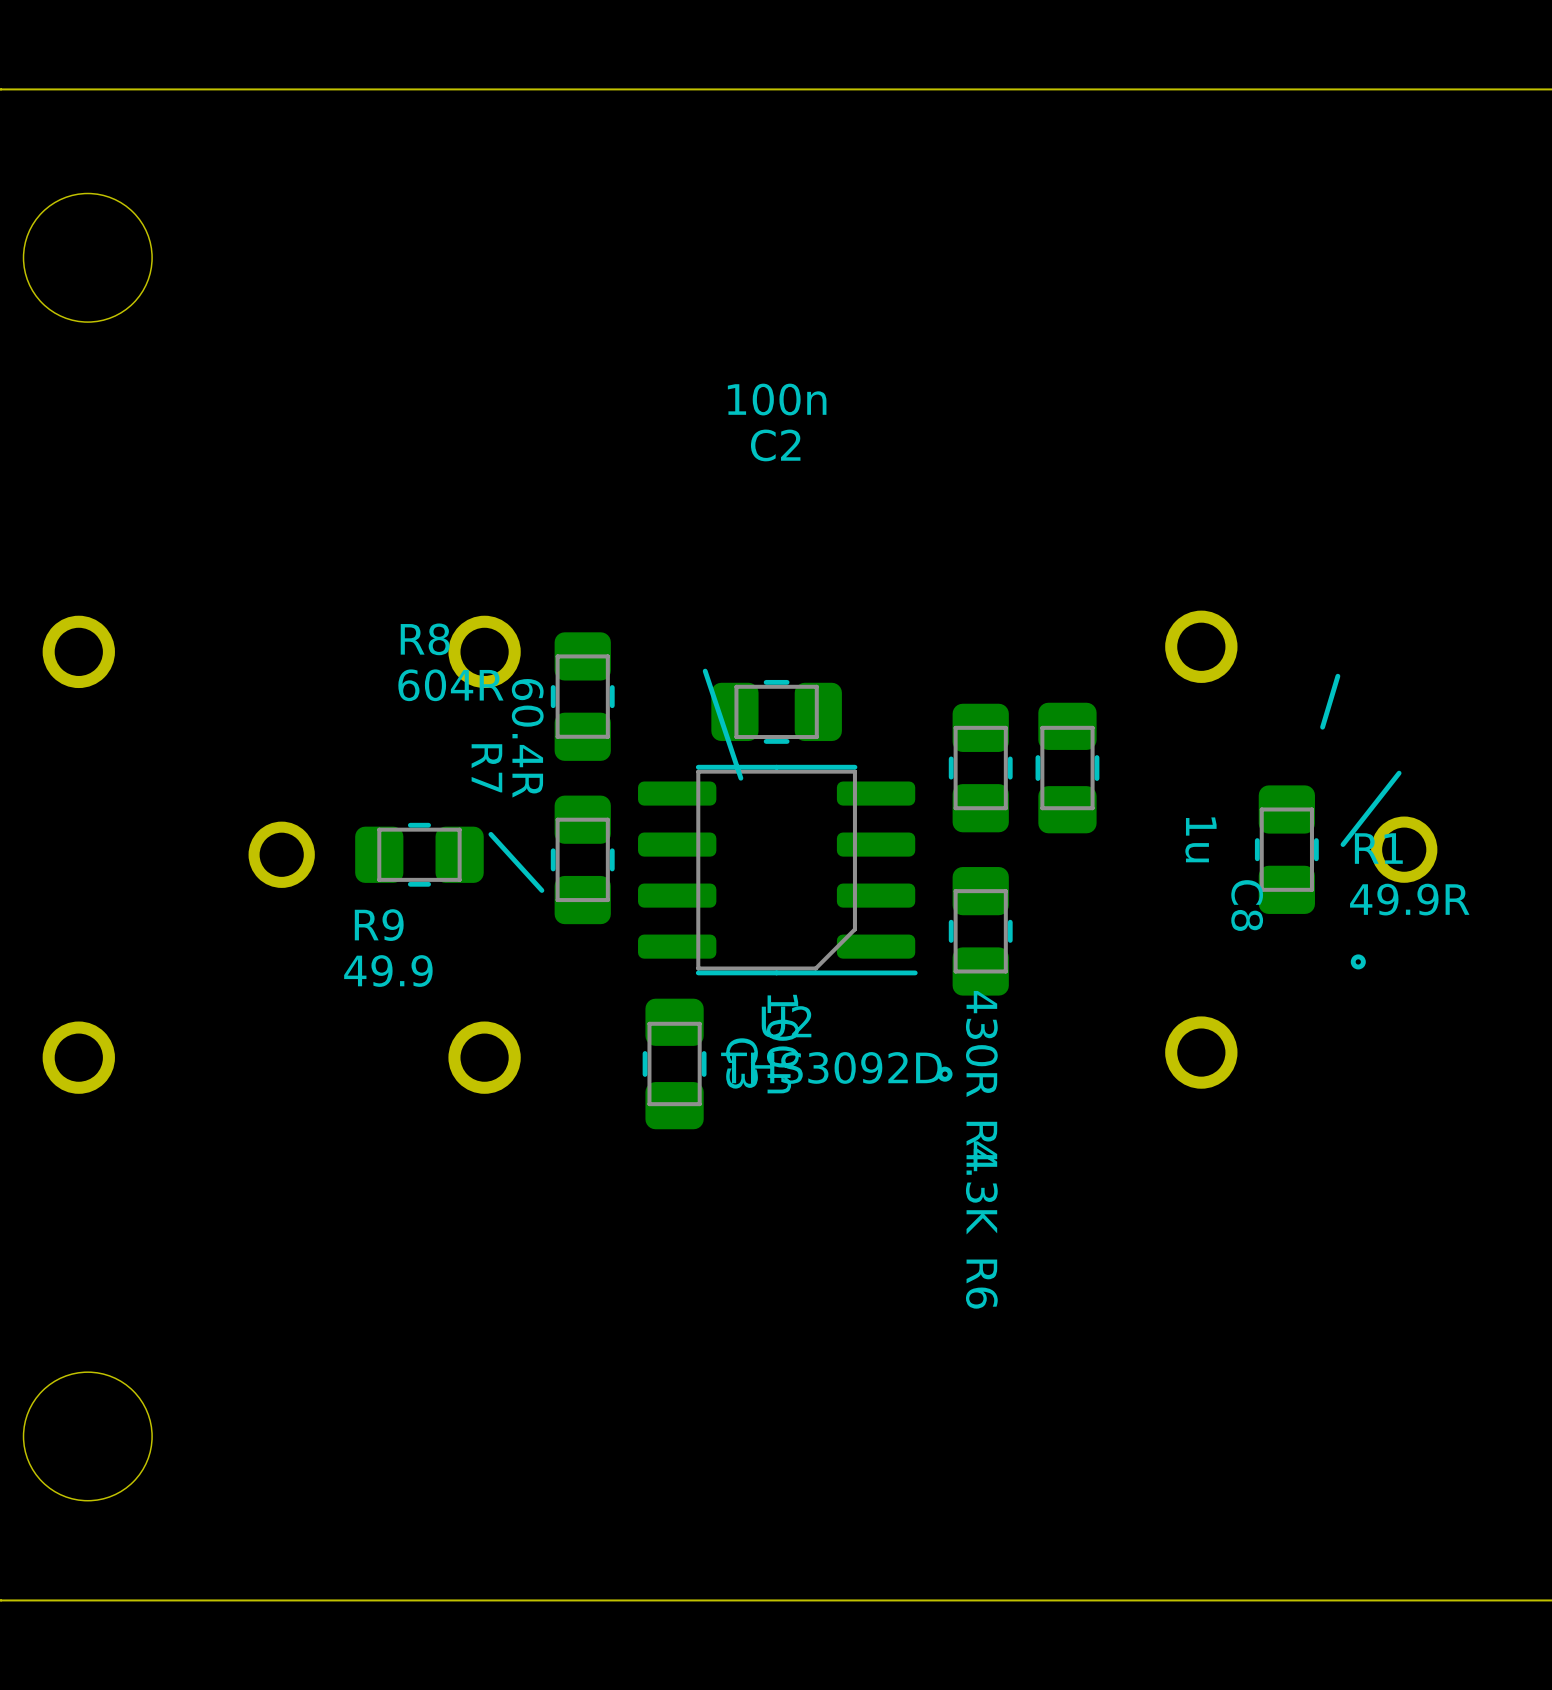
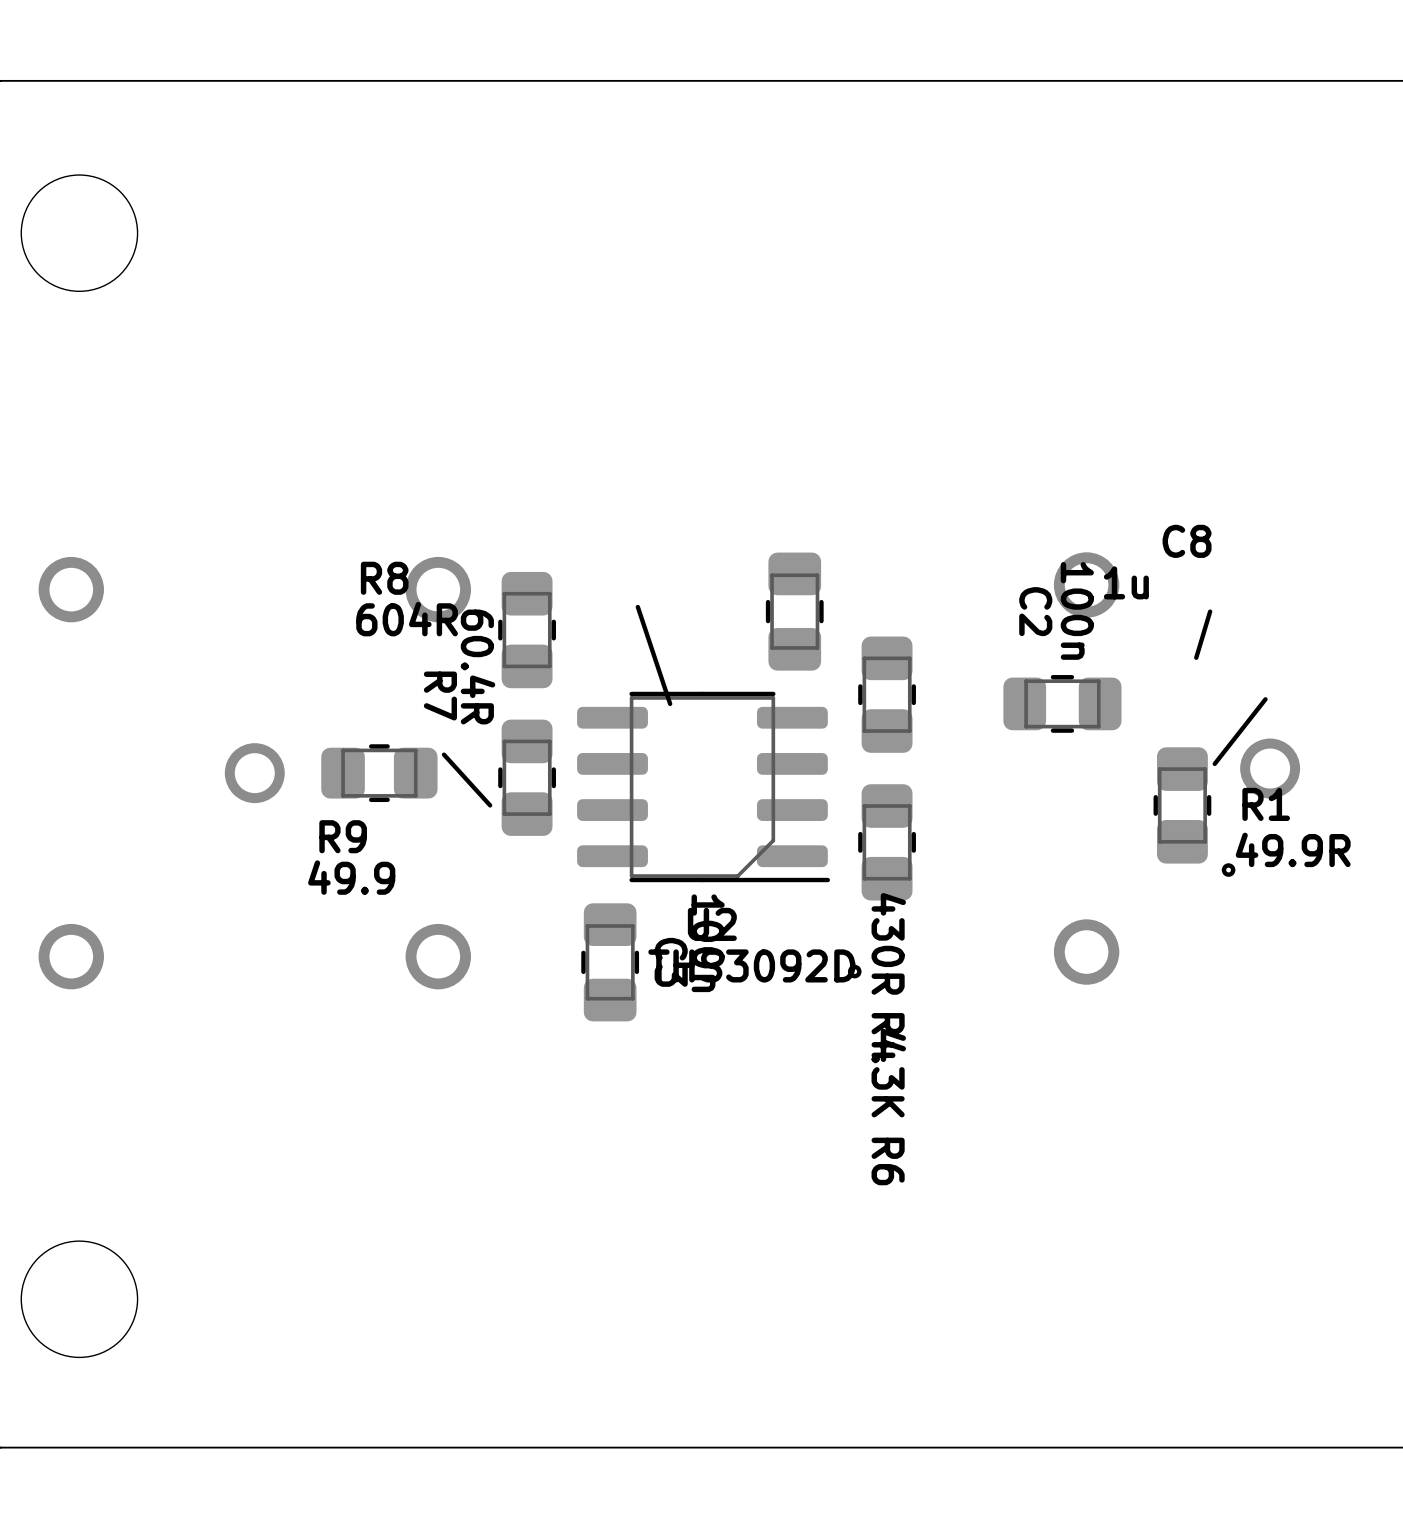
C2 rotation: 0° (776, 711) -> 90° clockwise (794, 611)
C2 position: (776, 711) -> (794, 611)
C8 rotation: 0° (1067, 768) -> 90° clockwise (1062, 703)
C8 position: (1067, 768) -> (1062, 703)
C8 value position: 1u (1200, 839) -> 1u (1126, 582)
R1 position: (1286, 849) -> (1182, 805)
C8 name position: C8 (1247, 905) -> C8 (1187, 541)

